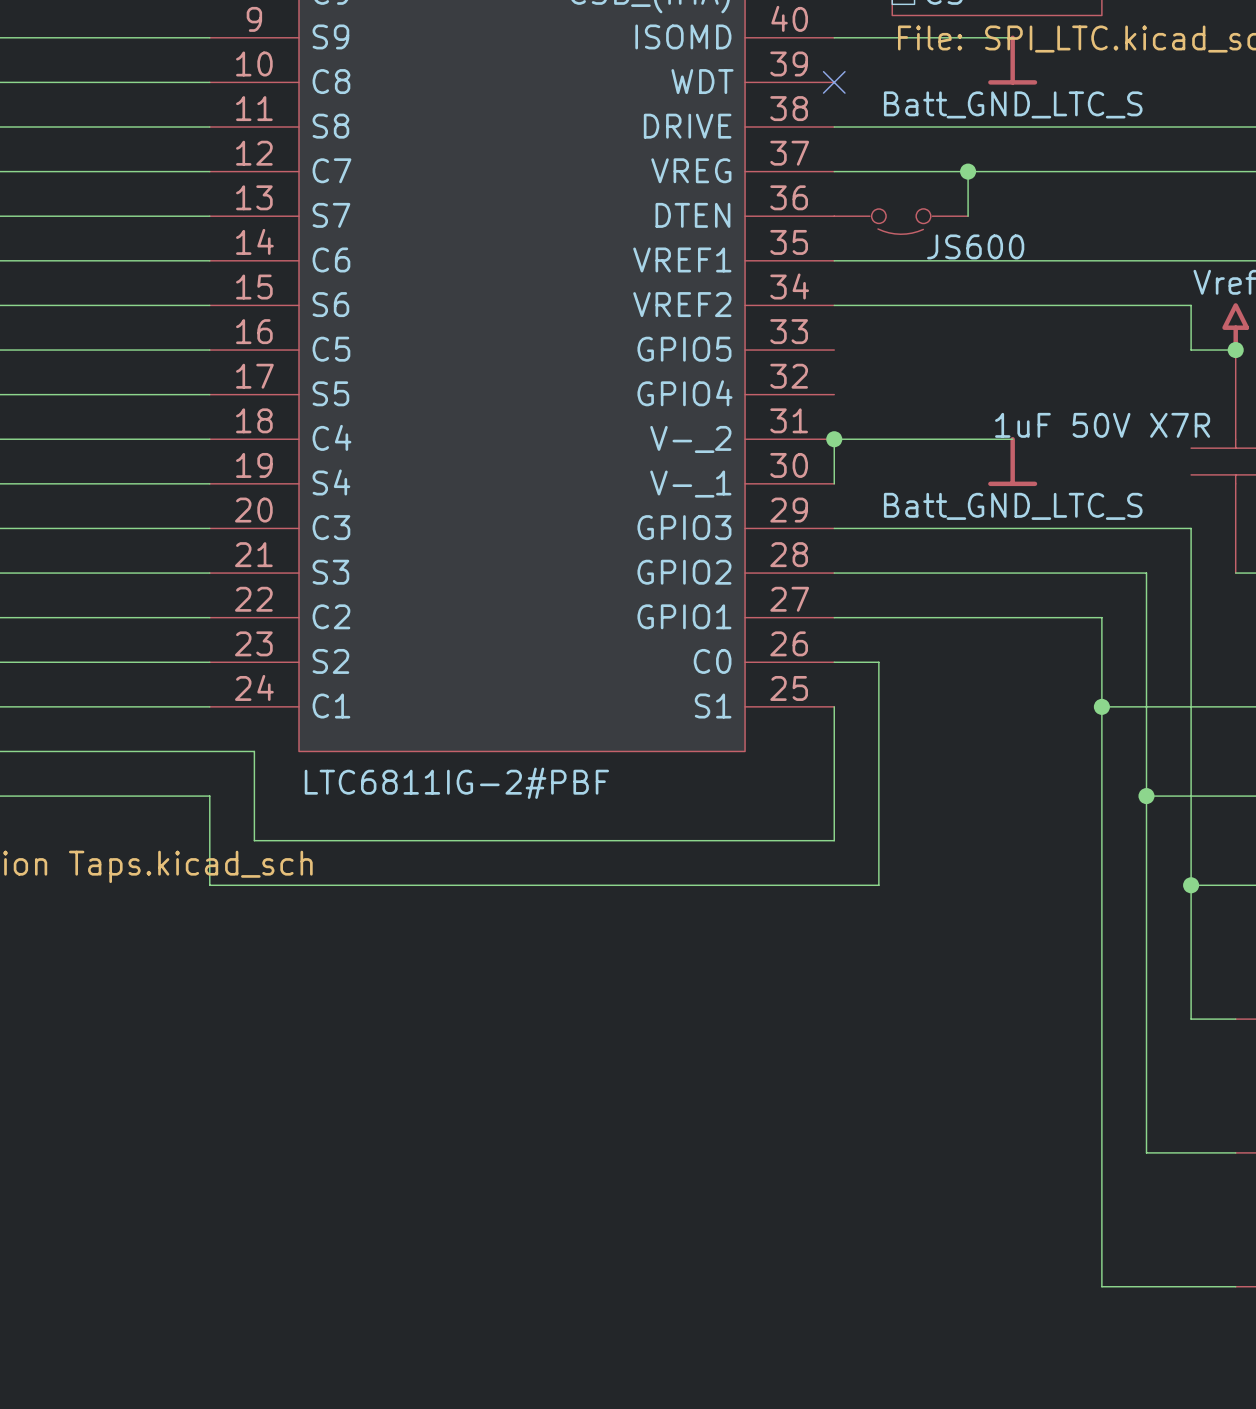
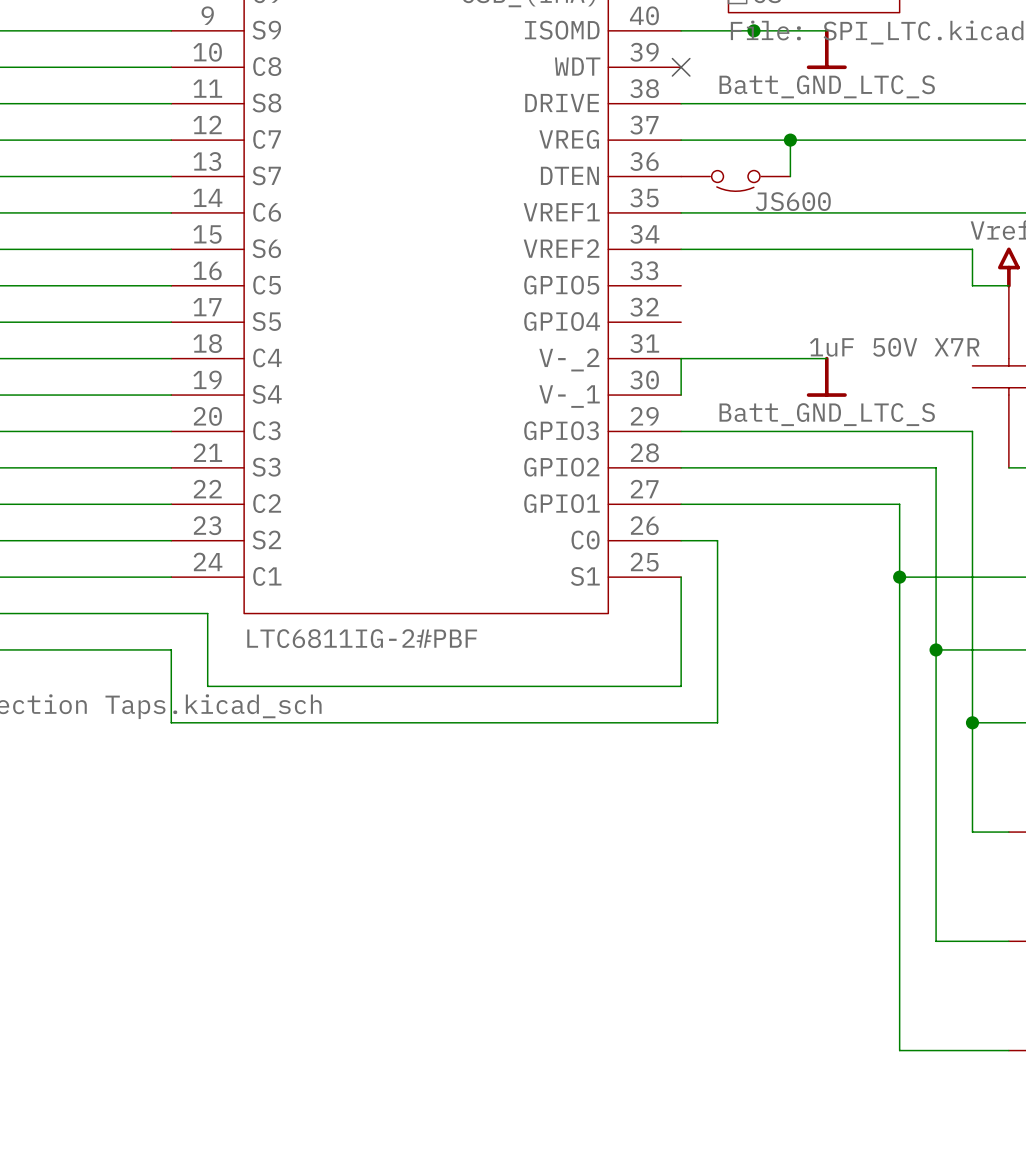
junction: none -> (753, 30)
junction: (1235, 350) -> none
junction: (834, 439) -> none

